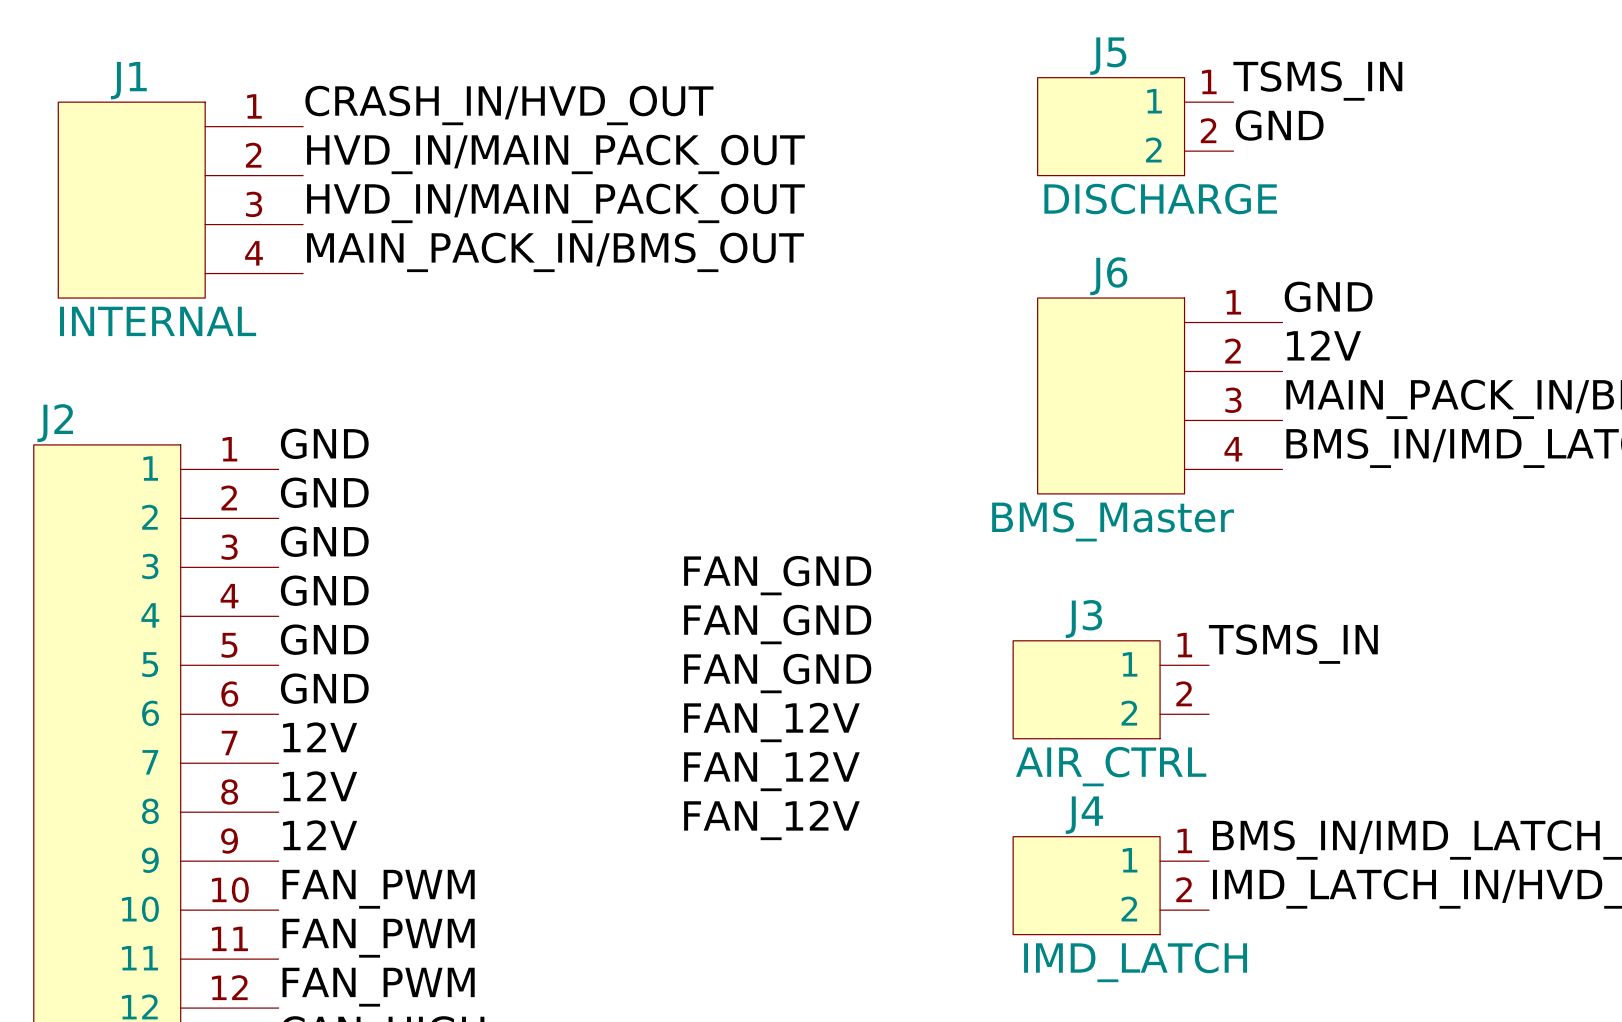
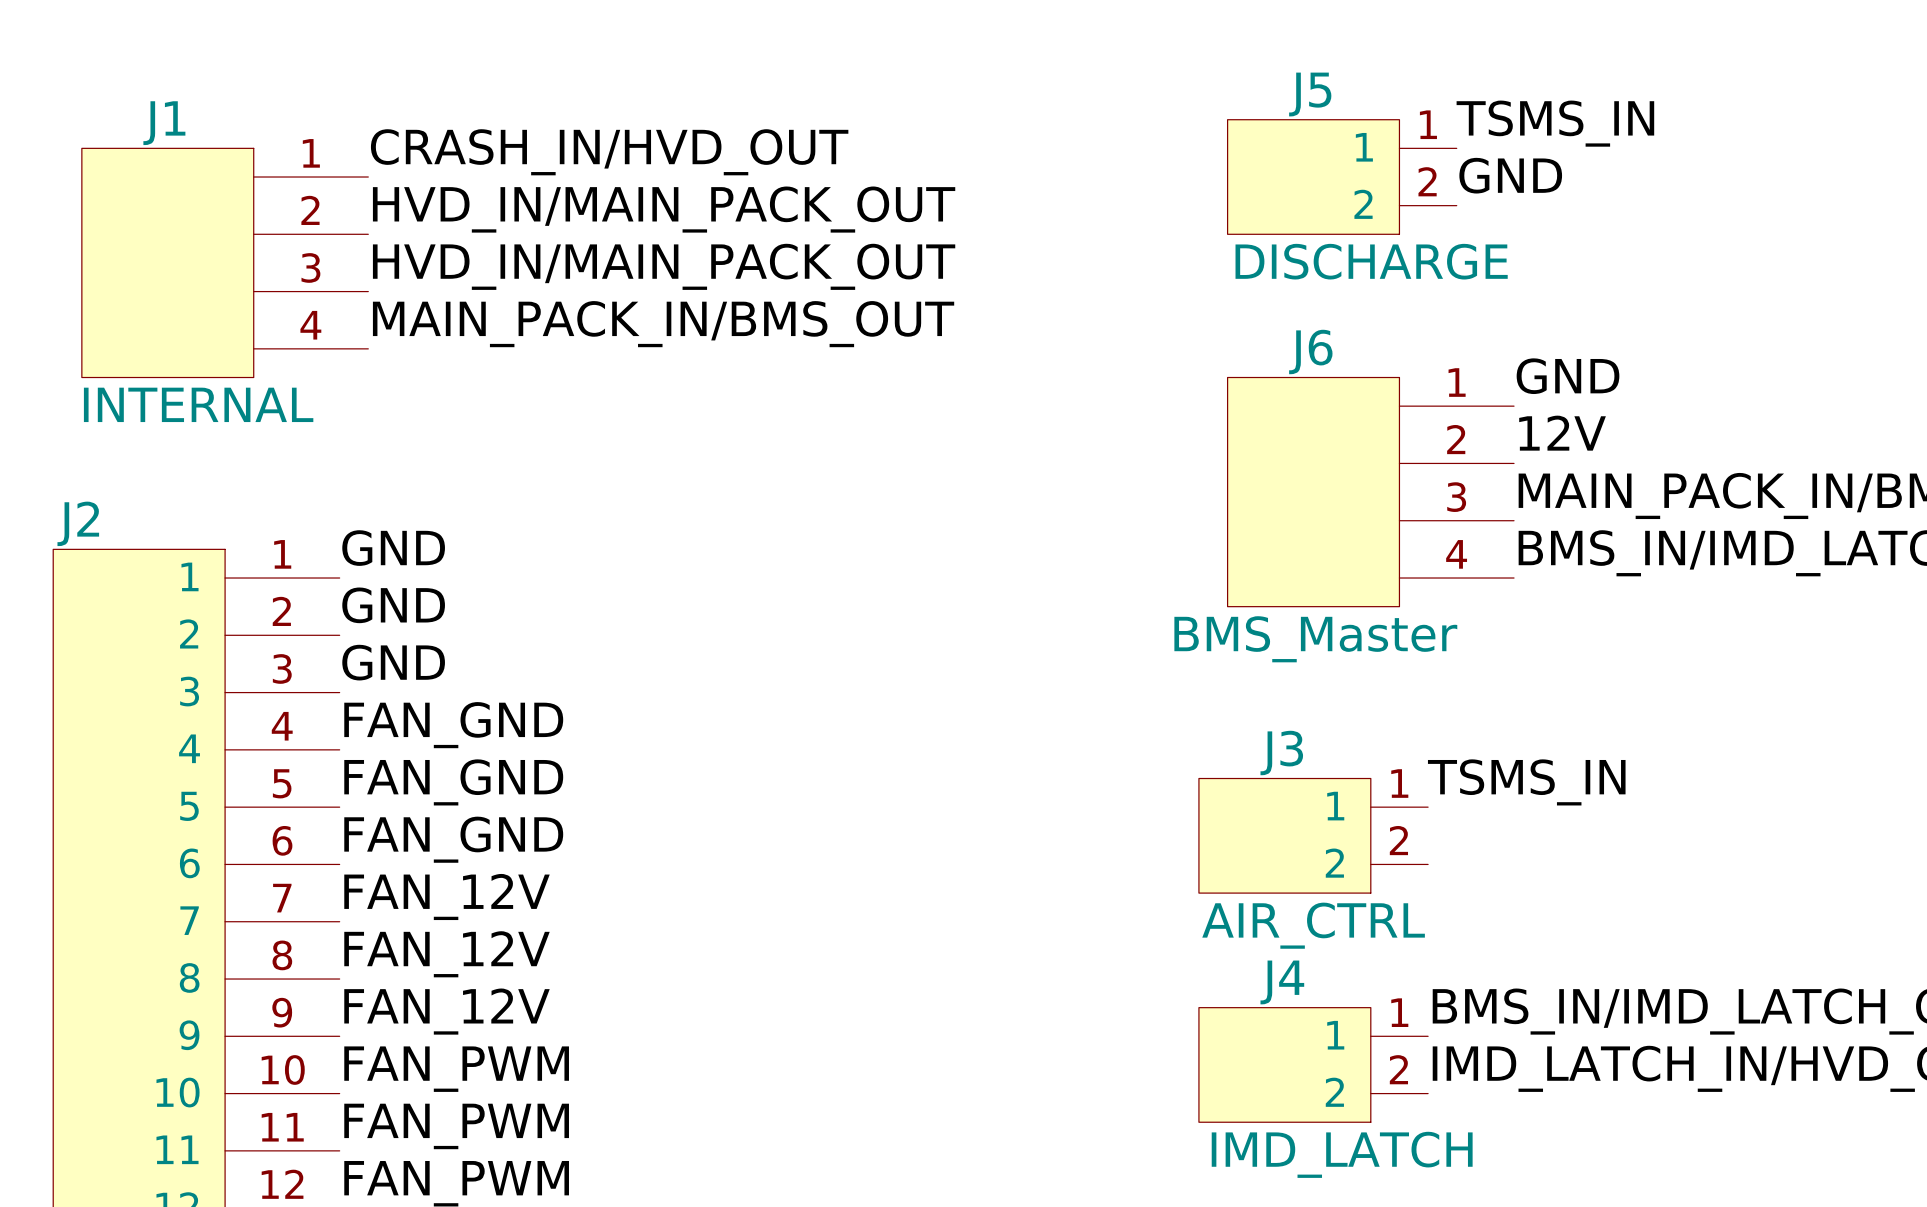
label: FAN_GND (777, 575) -> none
label: GND (324, 590) -> FAN_GND (453, 725)
label: FAN_GND (777, 624) -> none
label: GND (324, 639) -> FAN_GND (453, 782)
label: FAN_GND (777, 673) -> none
label: GND (324, 688) -> FAN_GND (453, 839)
label: FAN_12V (771, 722) -> none
label: 12V (320, 737) -> FAN_12V (446, 896)
label: FAN_12V (771, 771) -> none
label: 12V (320, 786) -> FAN_12V (446, 954)
label: FAN_12V (771, 820) -> none
label: 12V (320, 835) -> FAN_12V (446, 1011)

